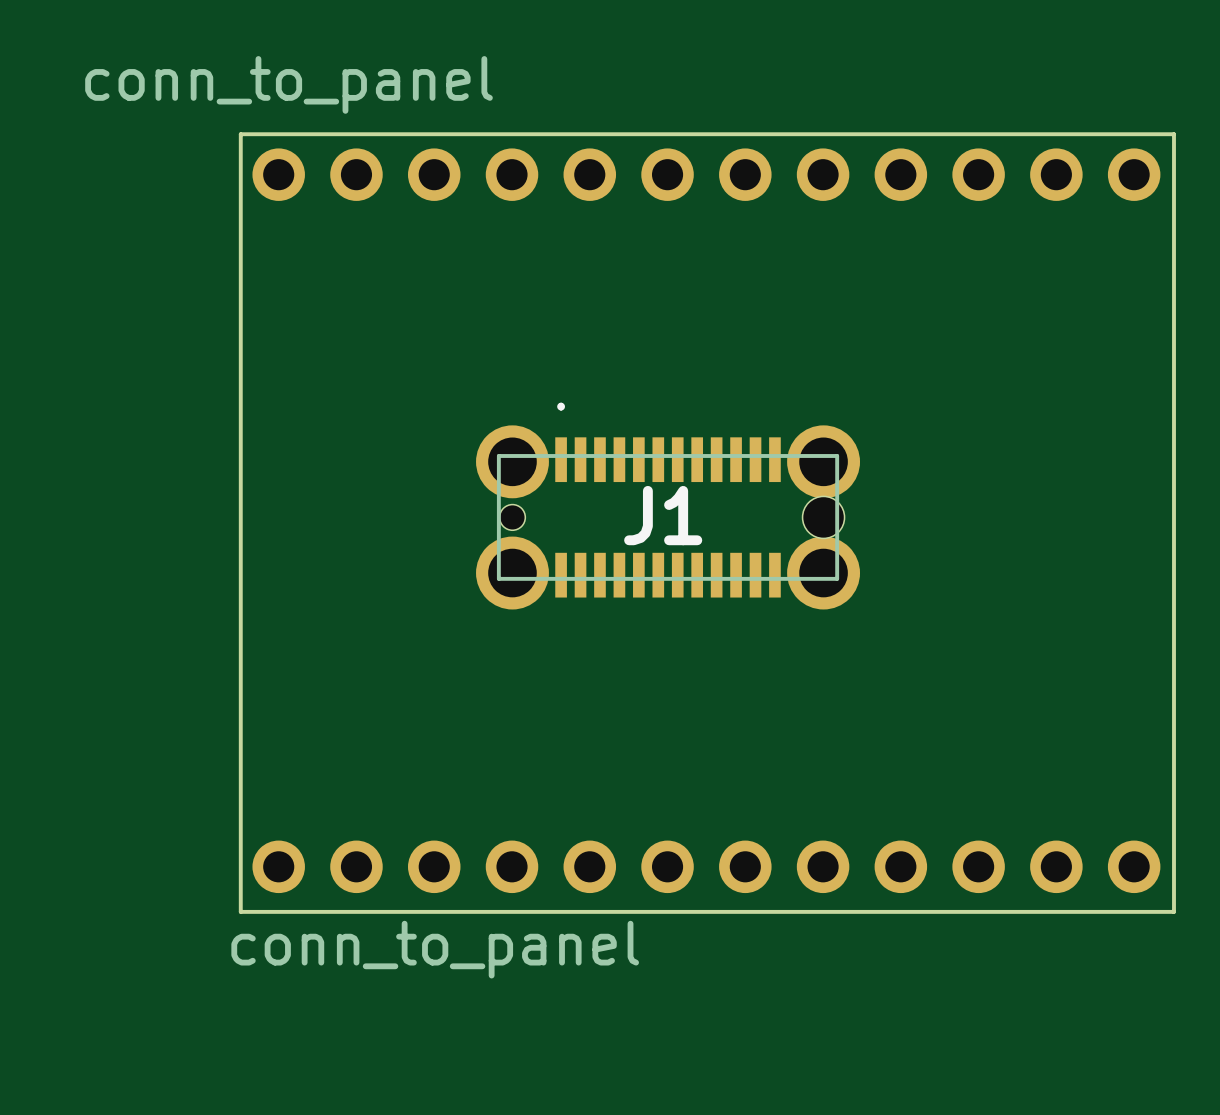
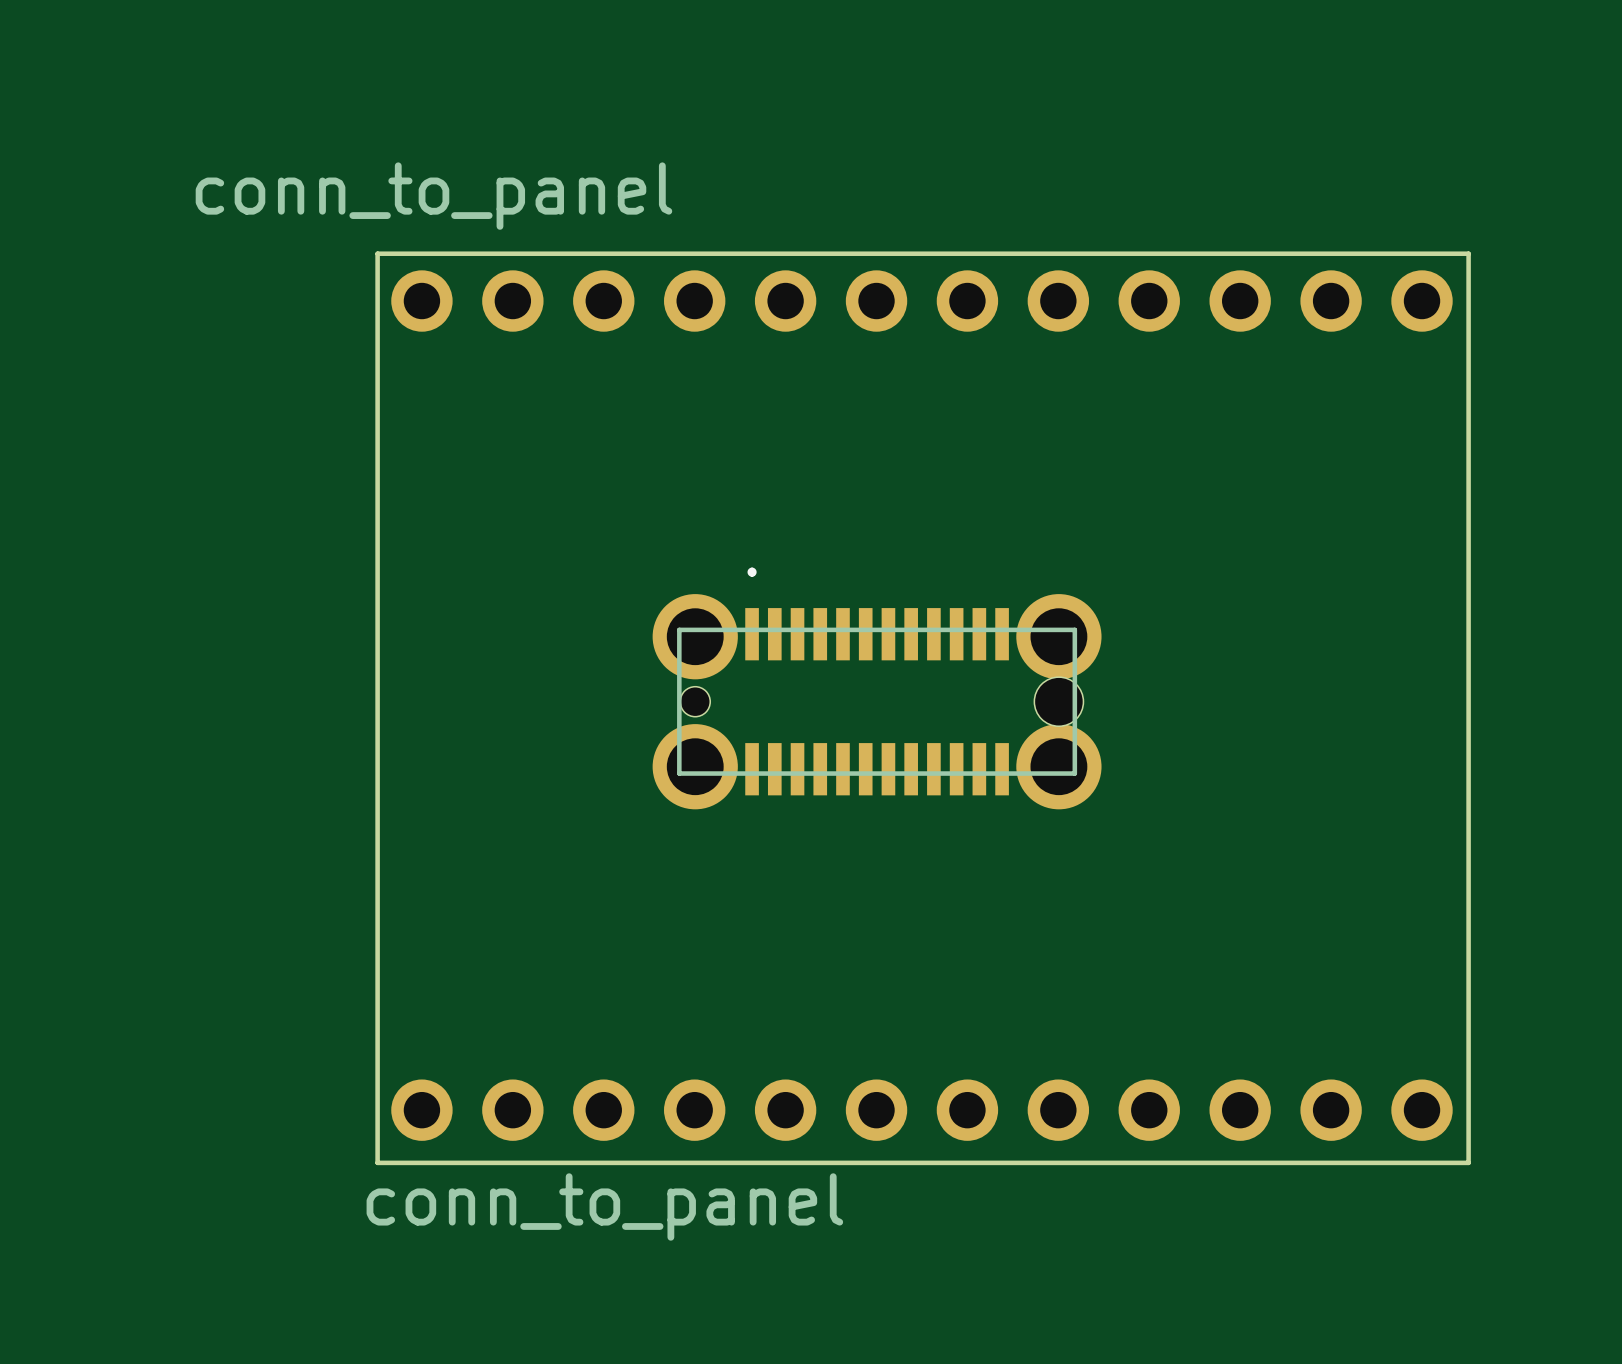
J1 name: J1 (663, 515) -> none

